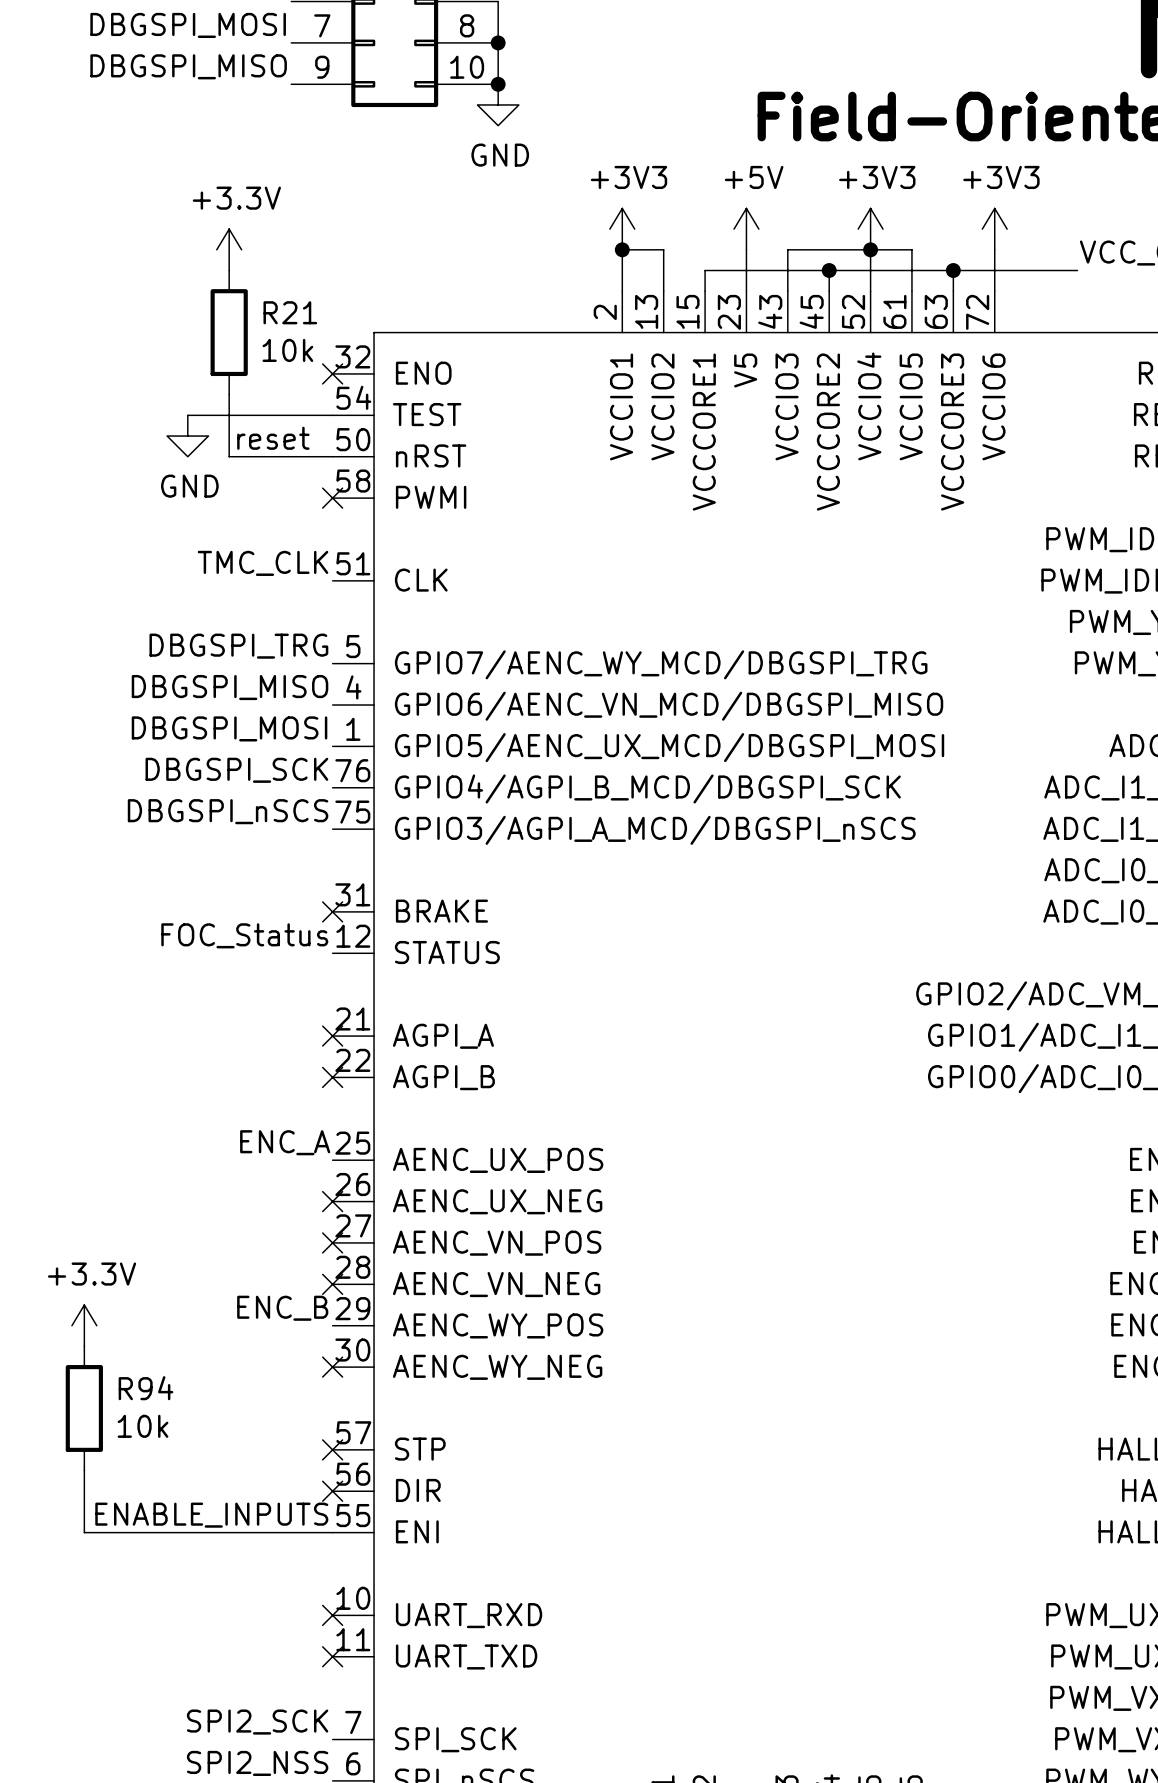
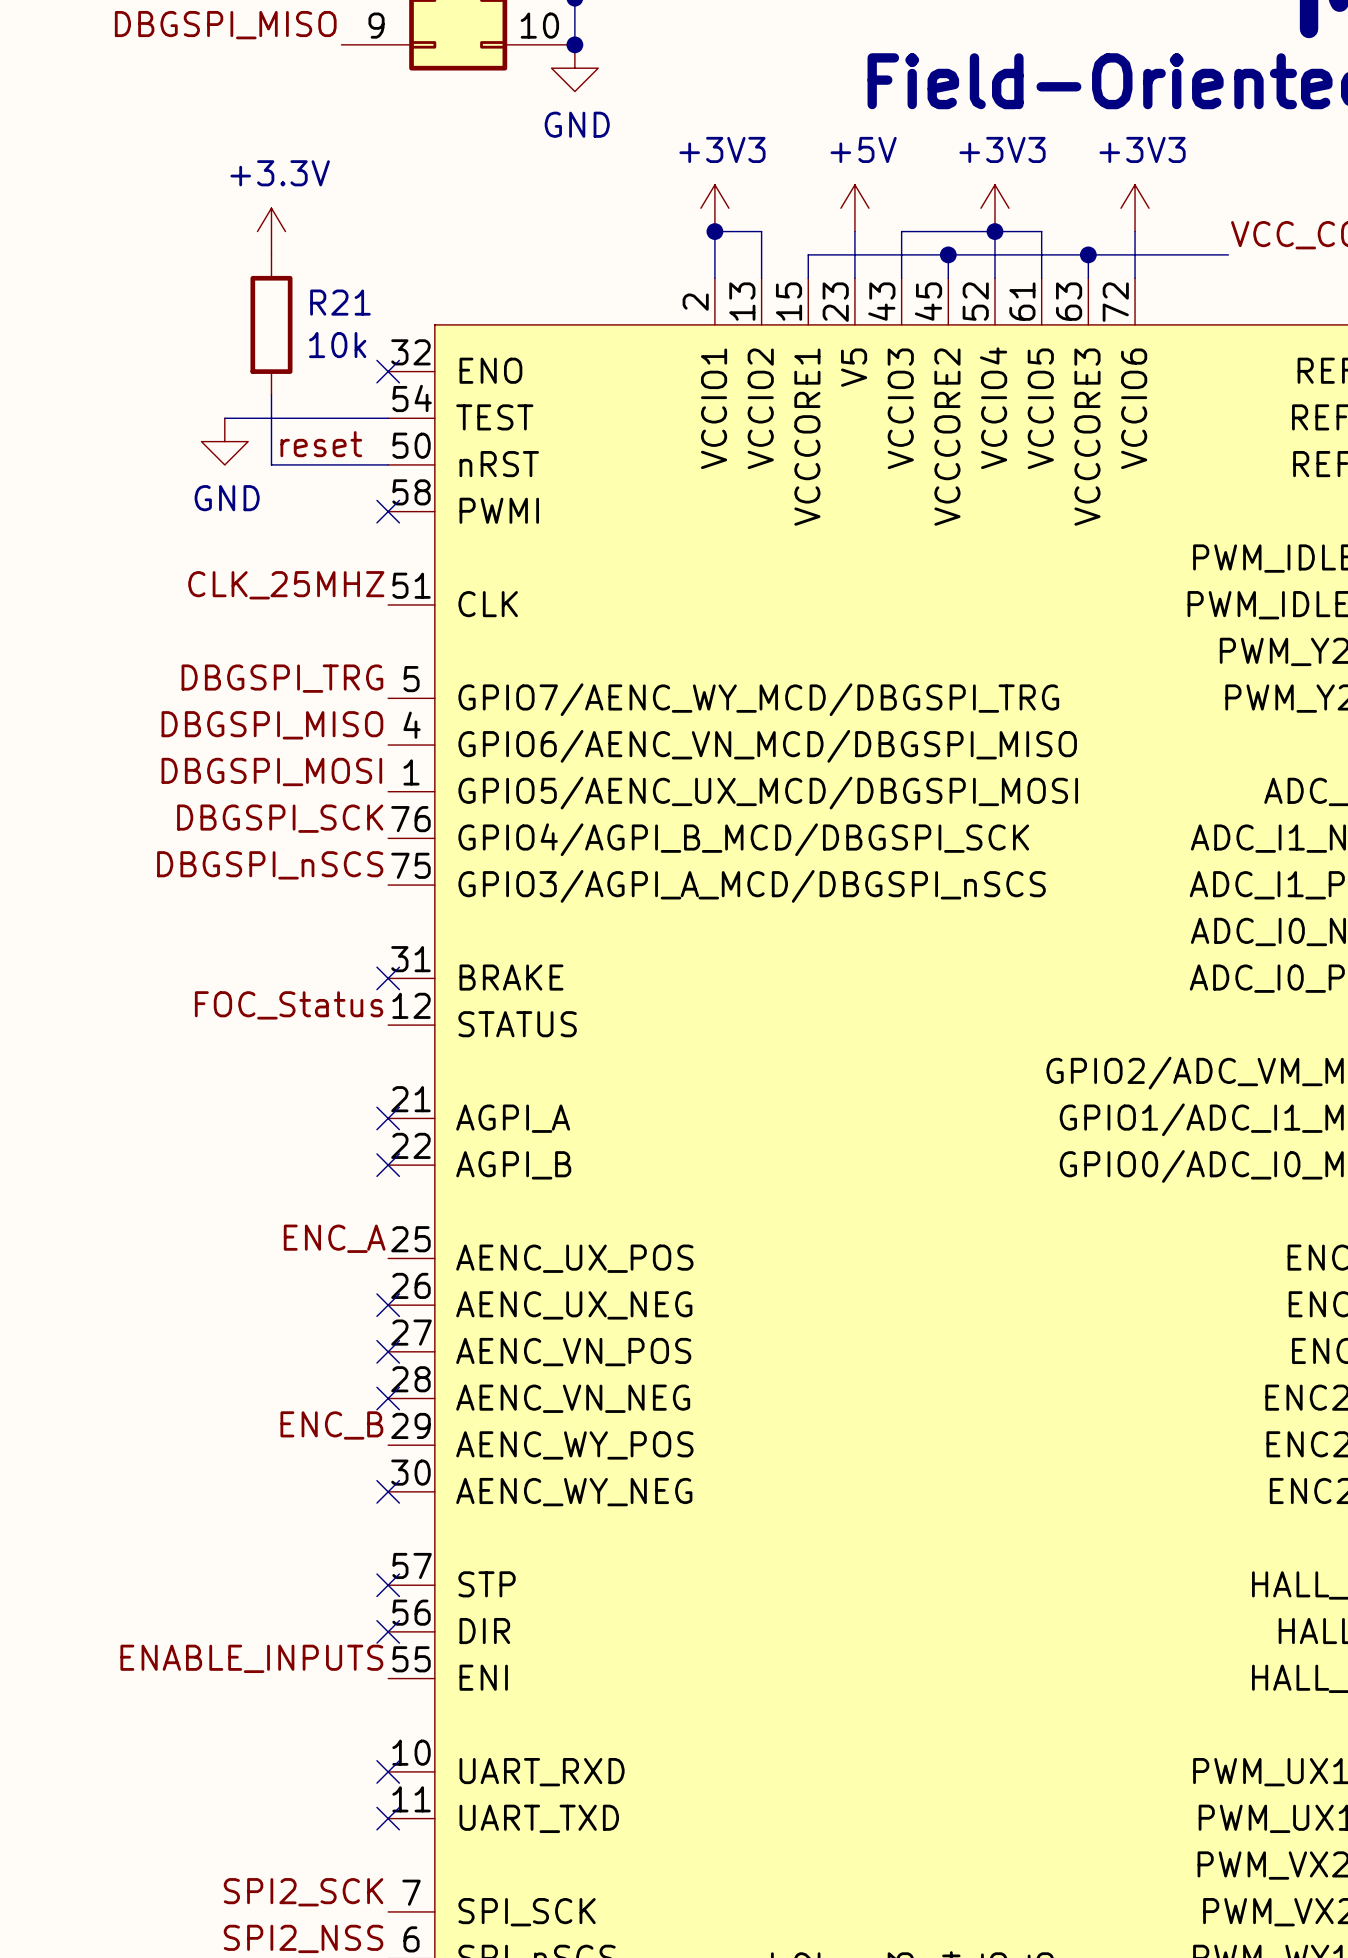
label: TMC_CLK (263, 563) -> CLK_25MHZ (286, 585)
power symbol: +3.3V (84, 1325) -> none
R94: 10k (84, 1408) -> none
wire: (84, 1470) (84, 1532) (332, 1532) -> none

